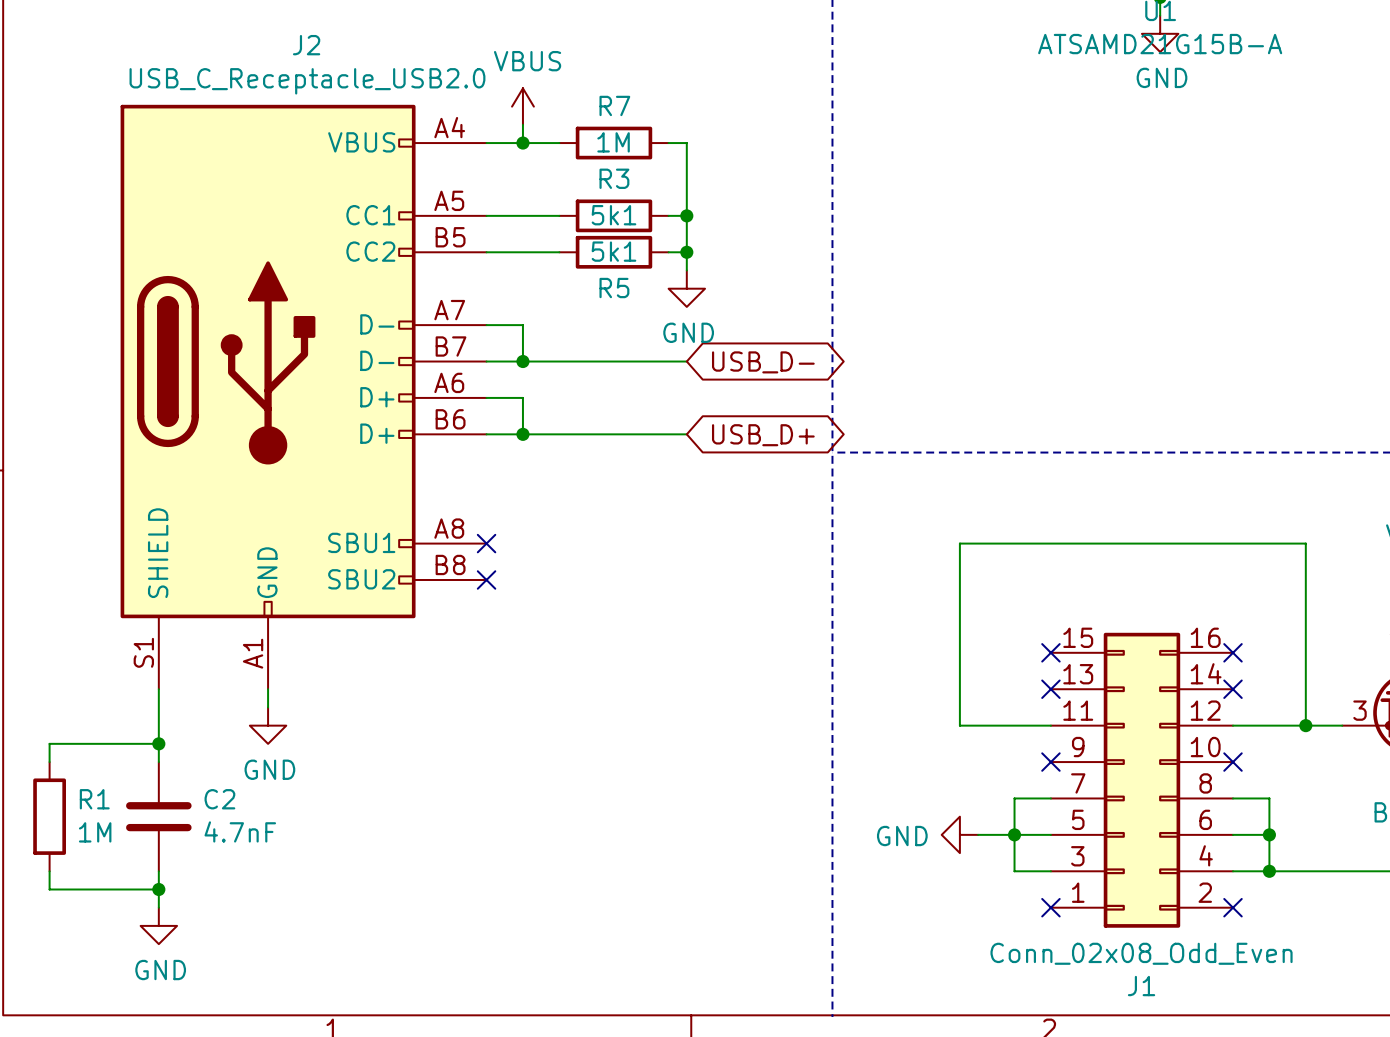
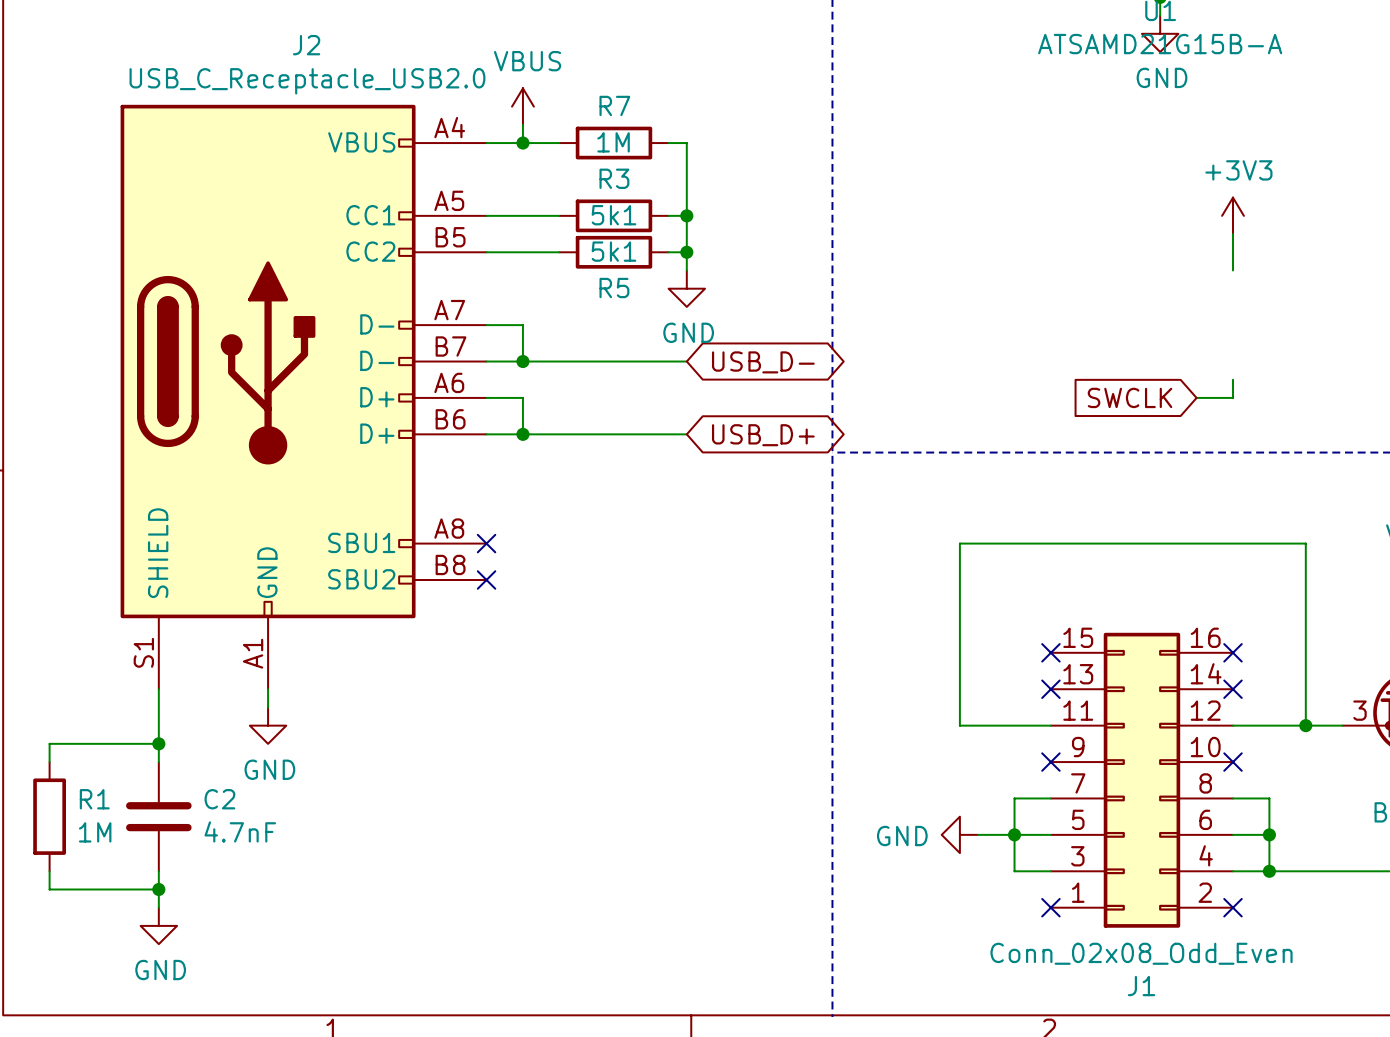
power symbol: none -> +3V3 (1233, 215)
wire: none -> (1233, 234) (1233, 270)
wire: none -> (1233, 379) (1233, 397) (1196, 397)
global label: none -> SWCLK (1130, 397)

